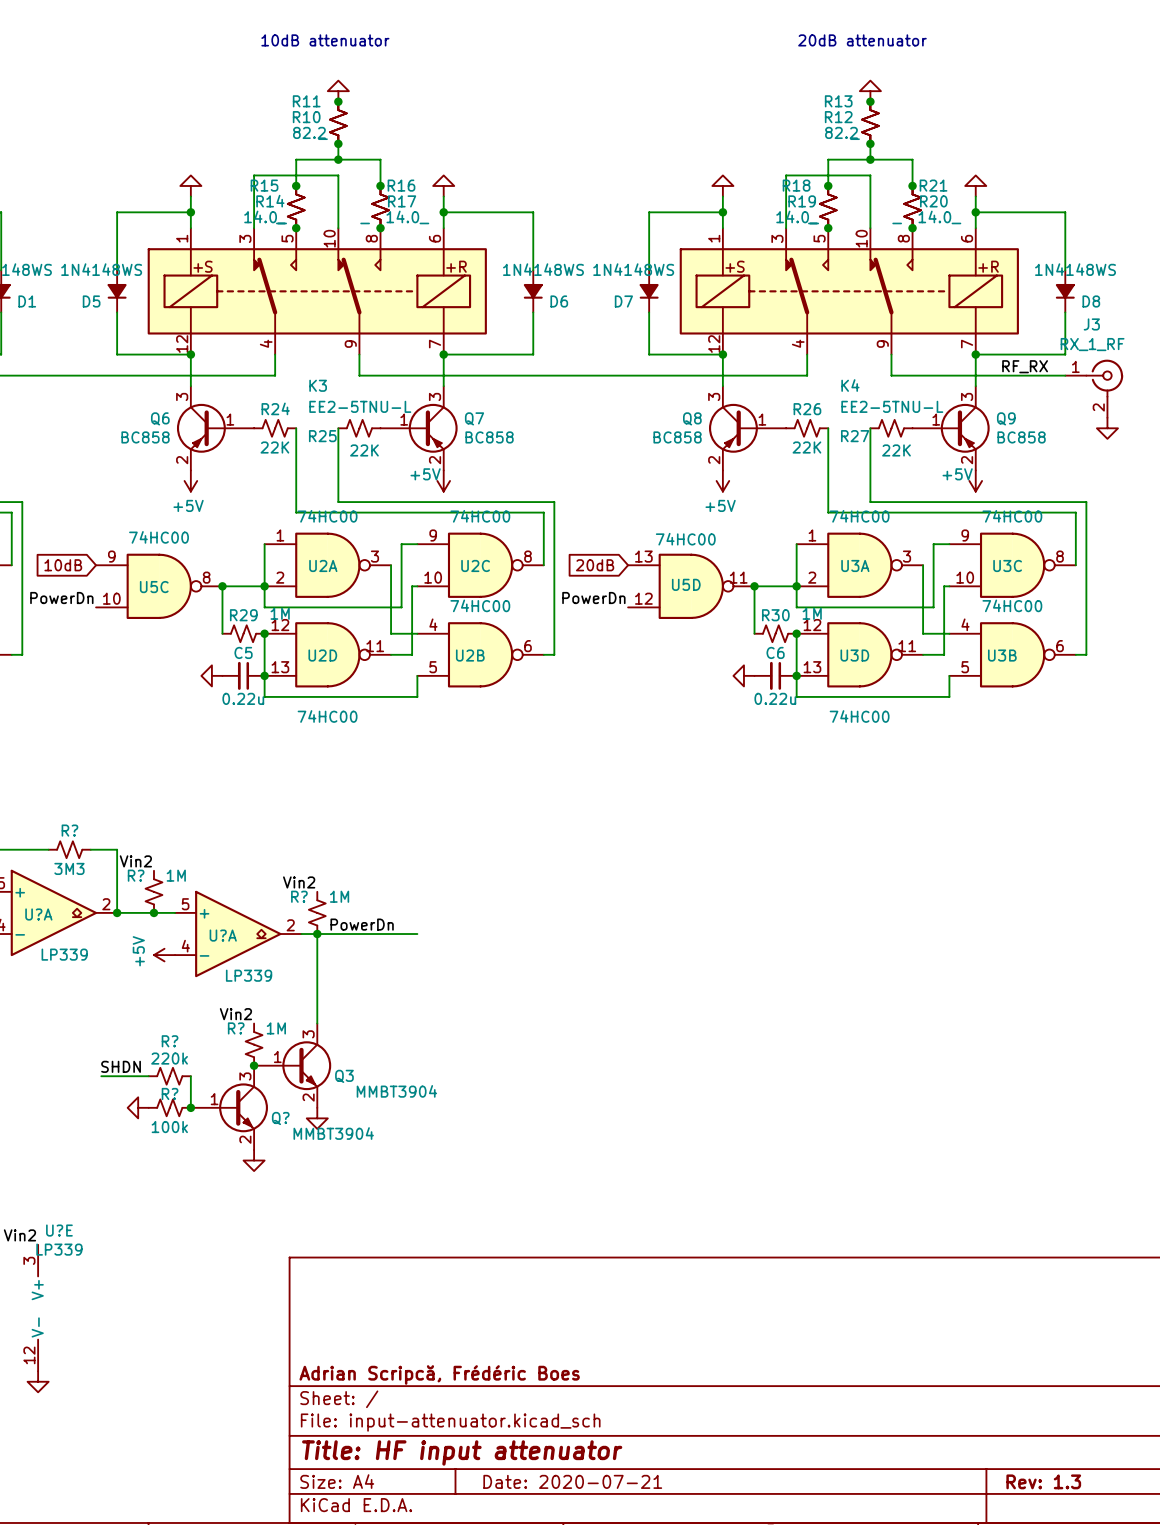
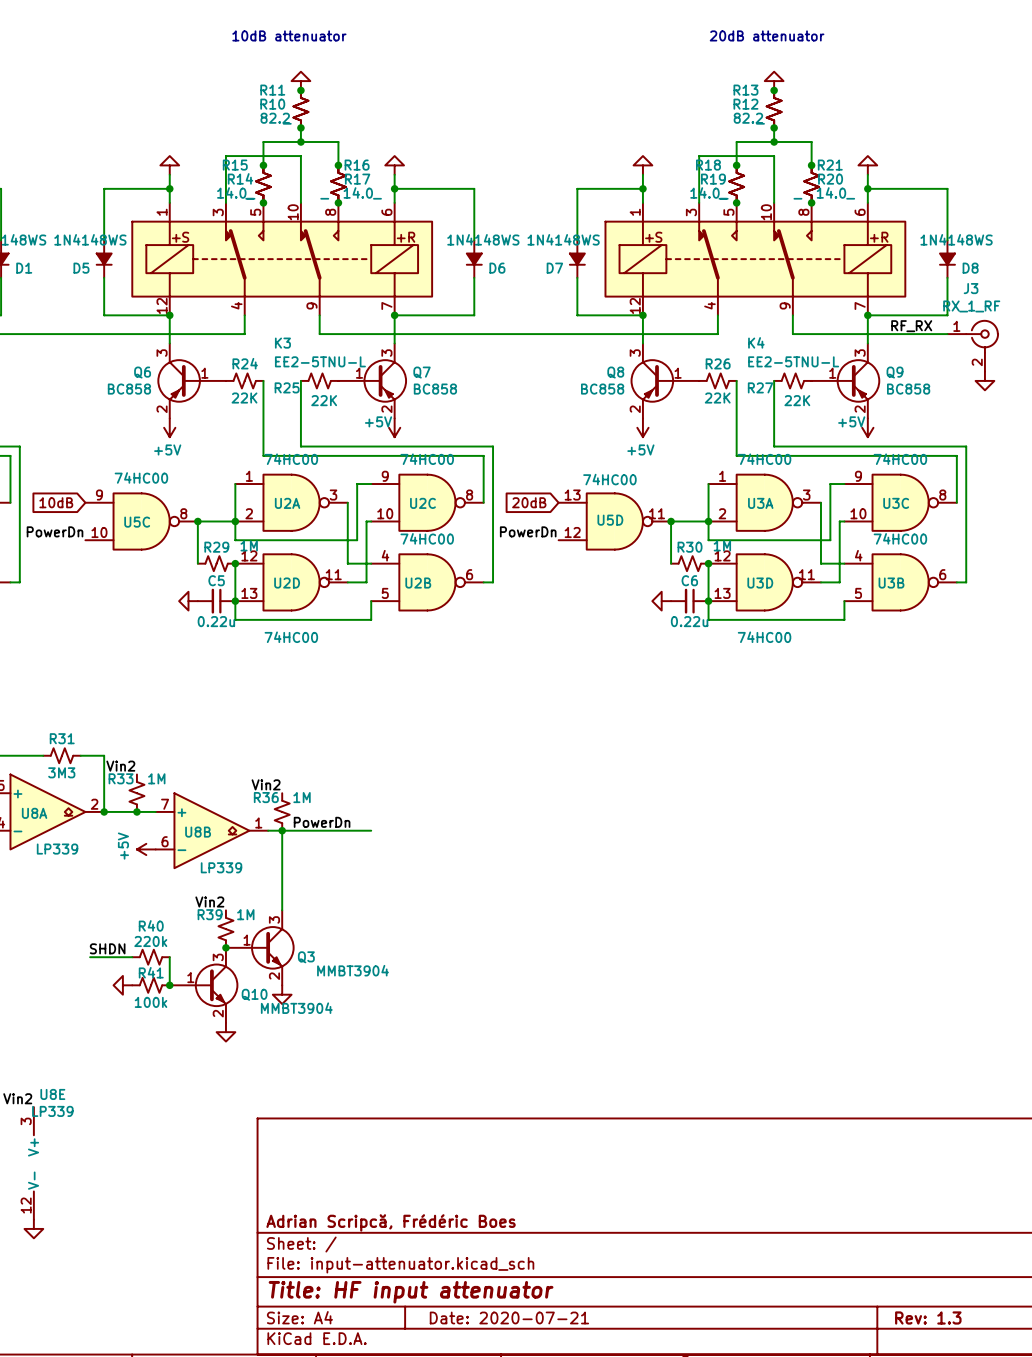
R? name: R? (69, 830) -> R31 (62, 738)
R? name: R? (136, 875) -> R33 (121, 778)
R? name: R? (299, 896) -> R36 (266, 797)
U?A pin number: 5 (185, 904) -> 7 (165, 804)
U?A name: U?A (38, 914) -> U8A (34, 813)
U?A pin number: 2 (290, 925) -> 1 (258, 822)
U?A name: U?A (223, 935) -> U8B (198, 832)
U?A pin number: 4 (185, 946) -> 6 (165, 841)
R? name: R? (236, 1028) -> R39 (210, 914)
R? name: R? (170, 1041) -> R40 (151, 925)
R? name: R? (170, 1093) -> R41 (151, 972)
Q? name: Q? (280, 1118) -> Q10 (254, 994)
U?E name: U?E (59, 1230) -> U8E (52, 1094)

